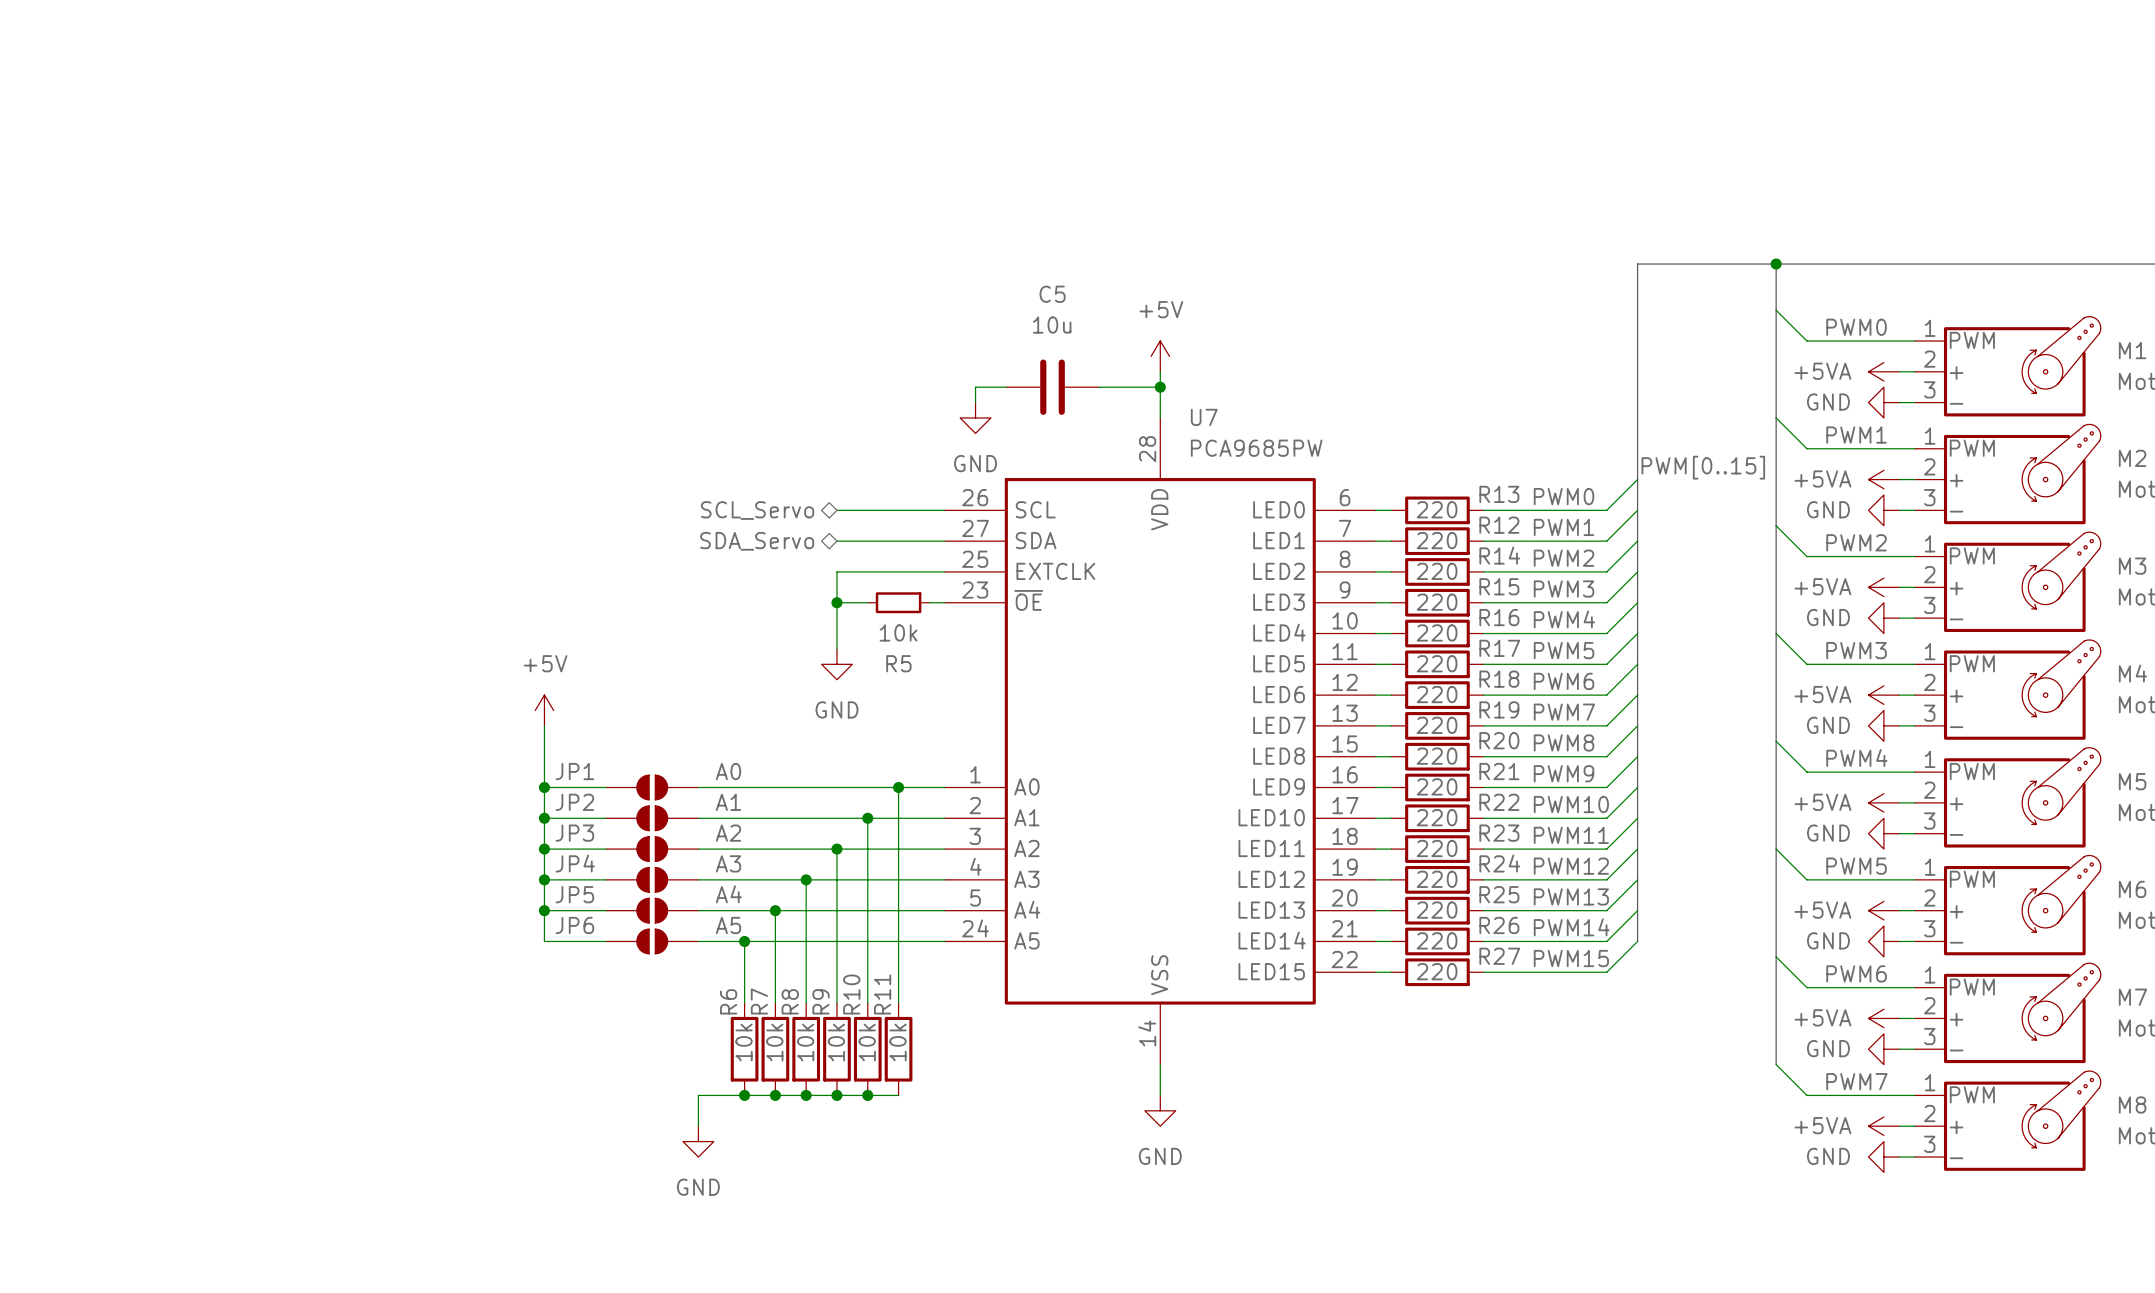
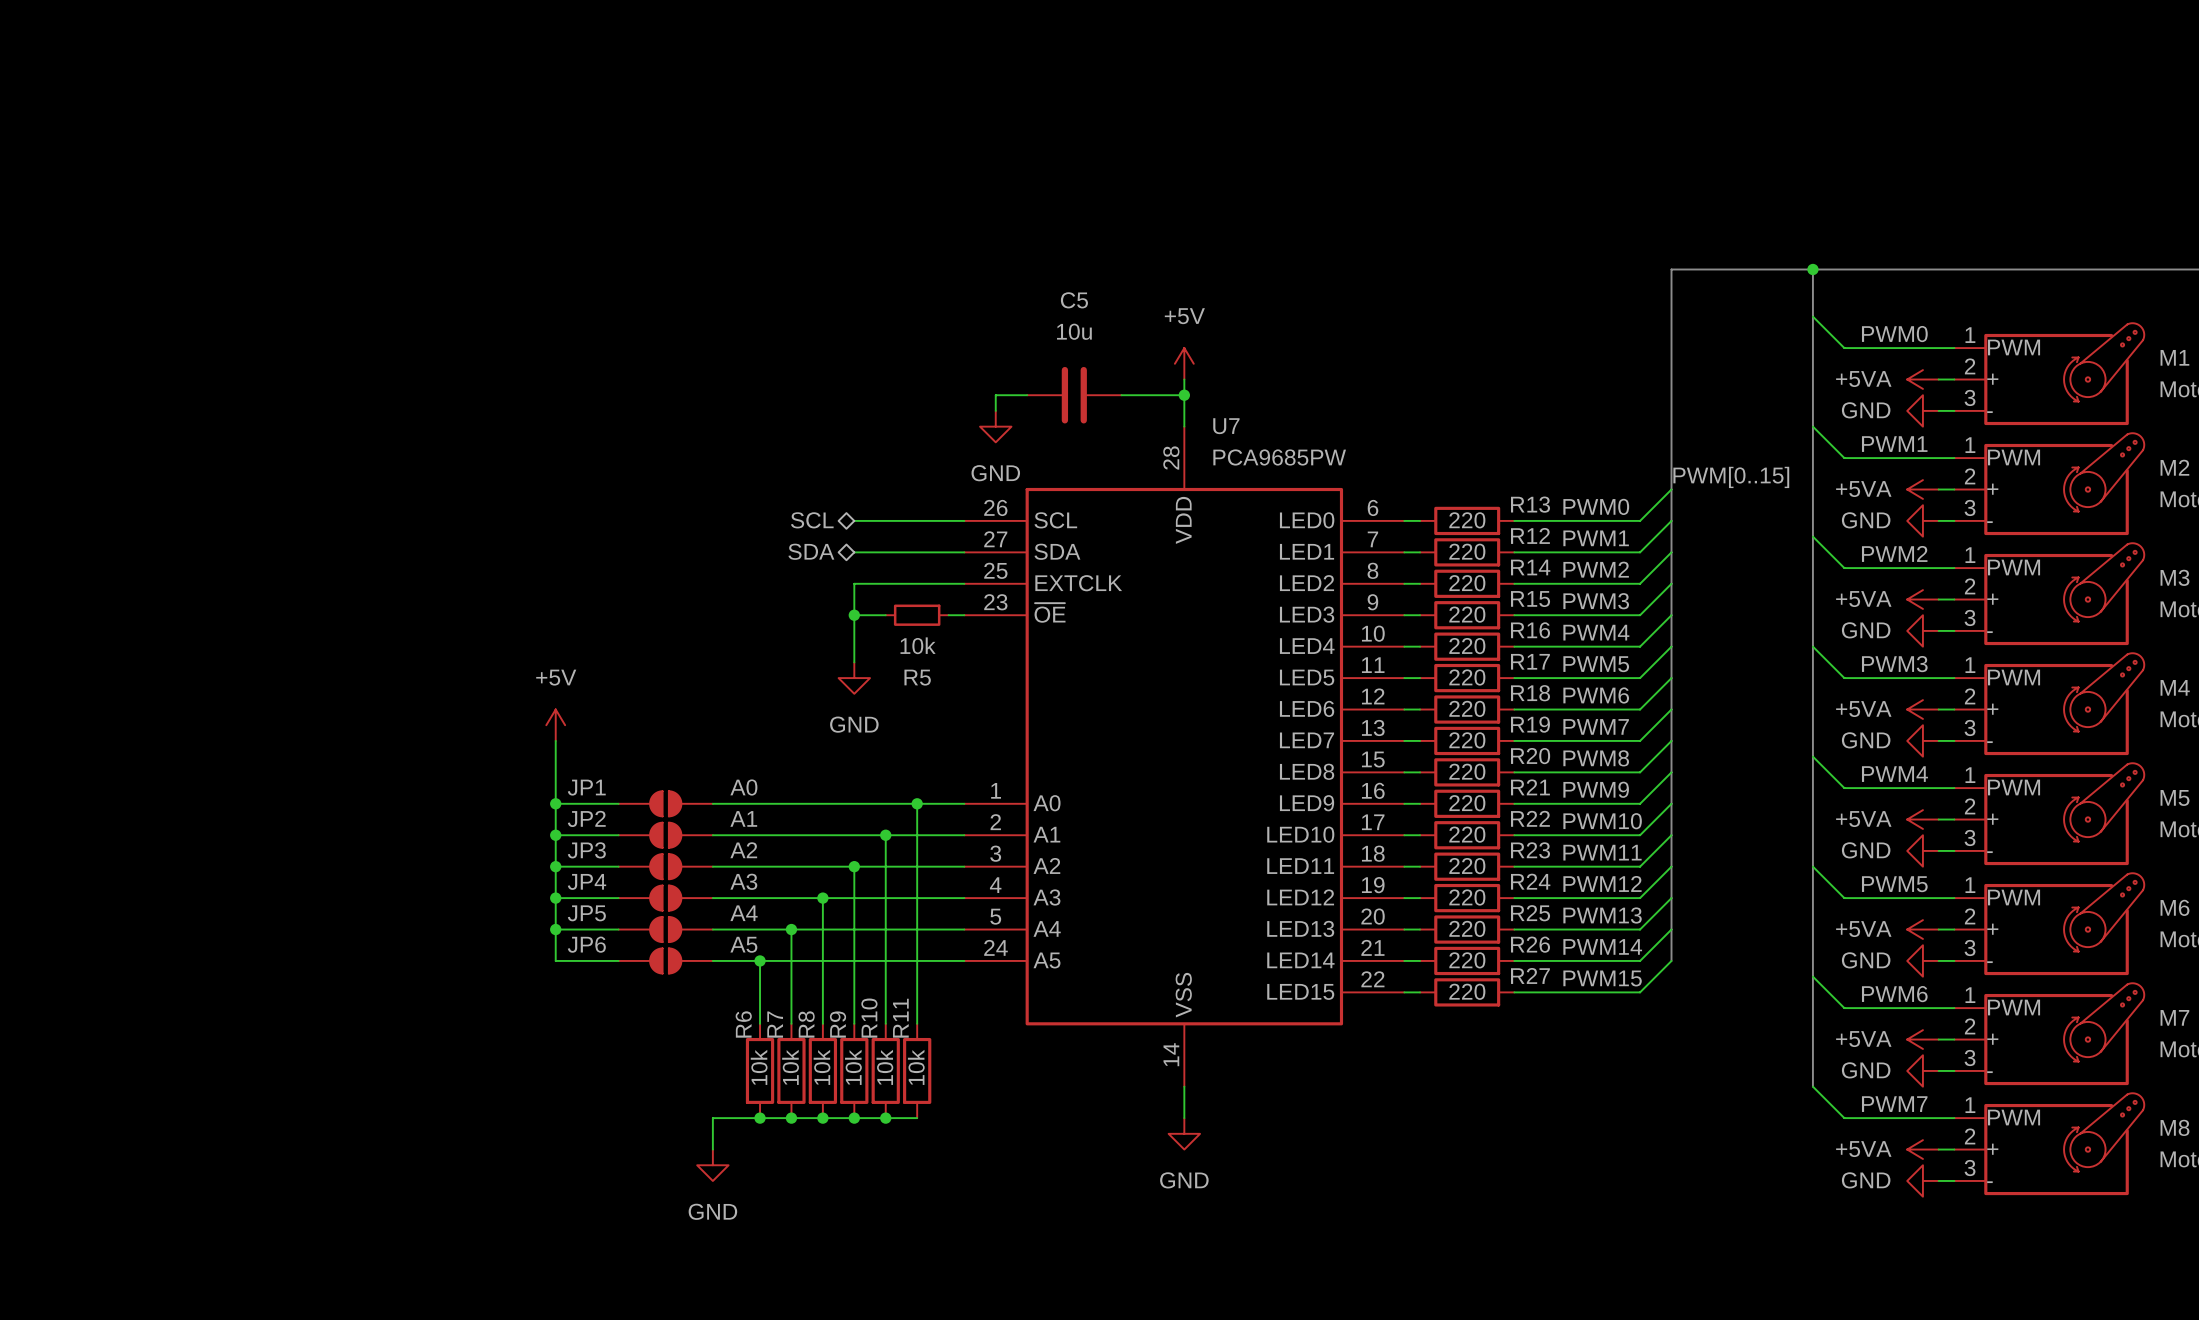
hierarchical label: SCL_Servo (757, 510) -> SCL (812, 520)
hierarchical label: SDA_Servo (757, 541) -> SDA (811, 551)

